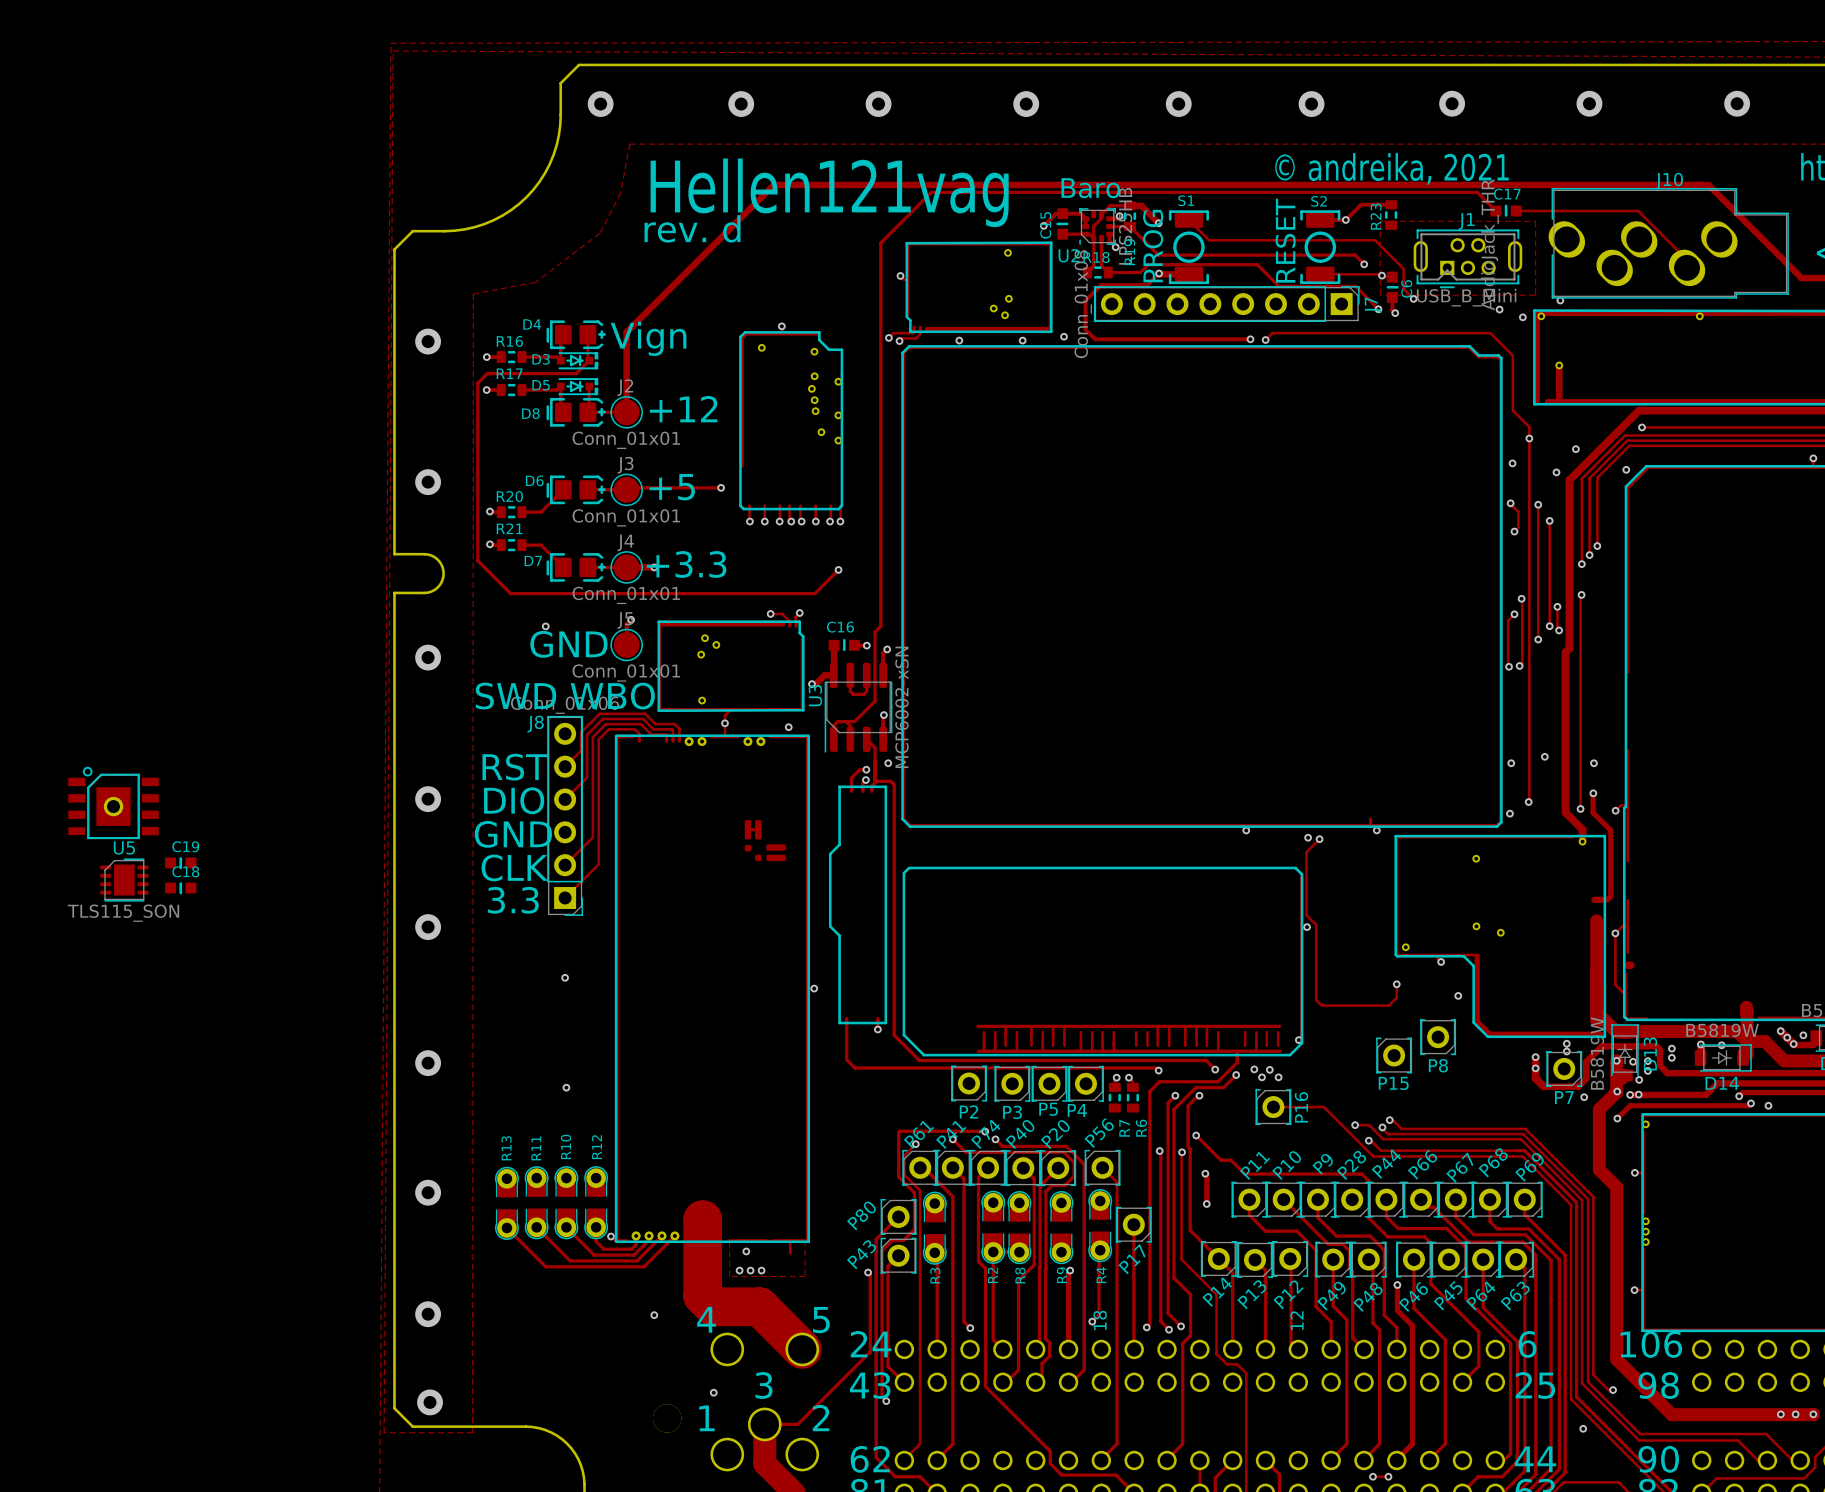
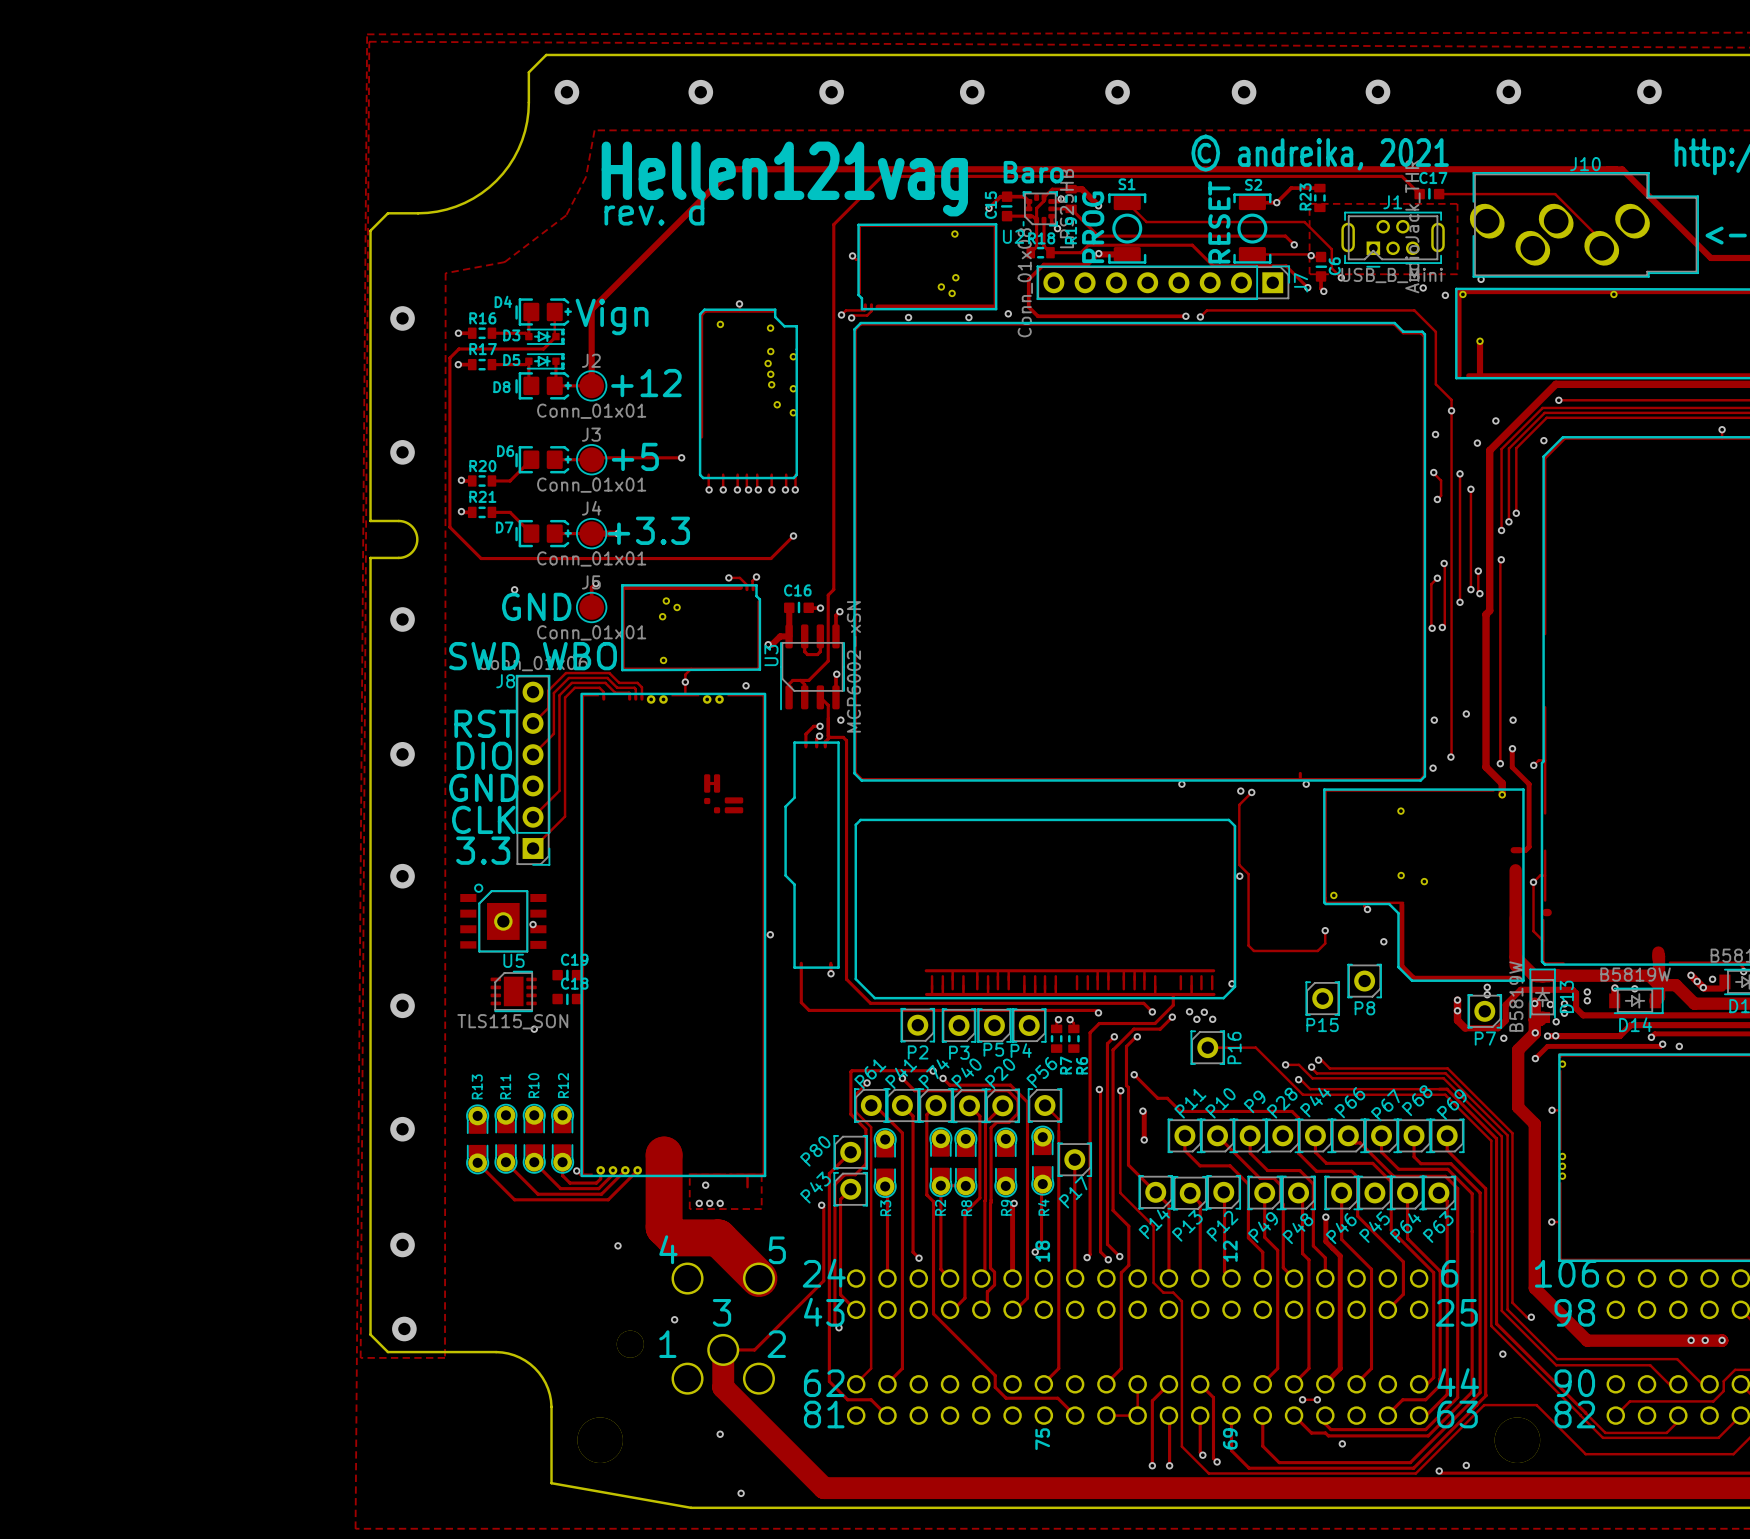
part: (113, 802) -> none
C19 position: (180, 863) -> (567, 975)
U5 position: (124, 880) -> (513, 991)
C18 position: (180, 888) -> (567, 999)
part: none -> (503, 918)

